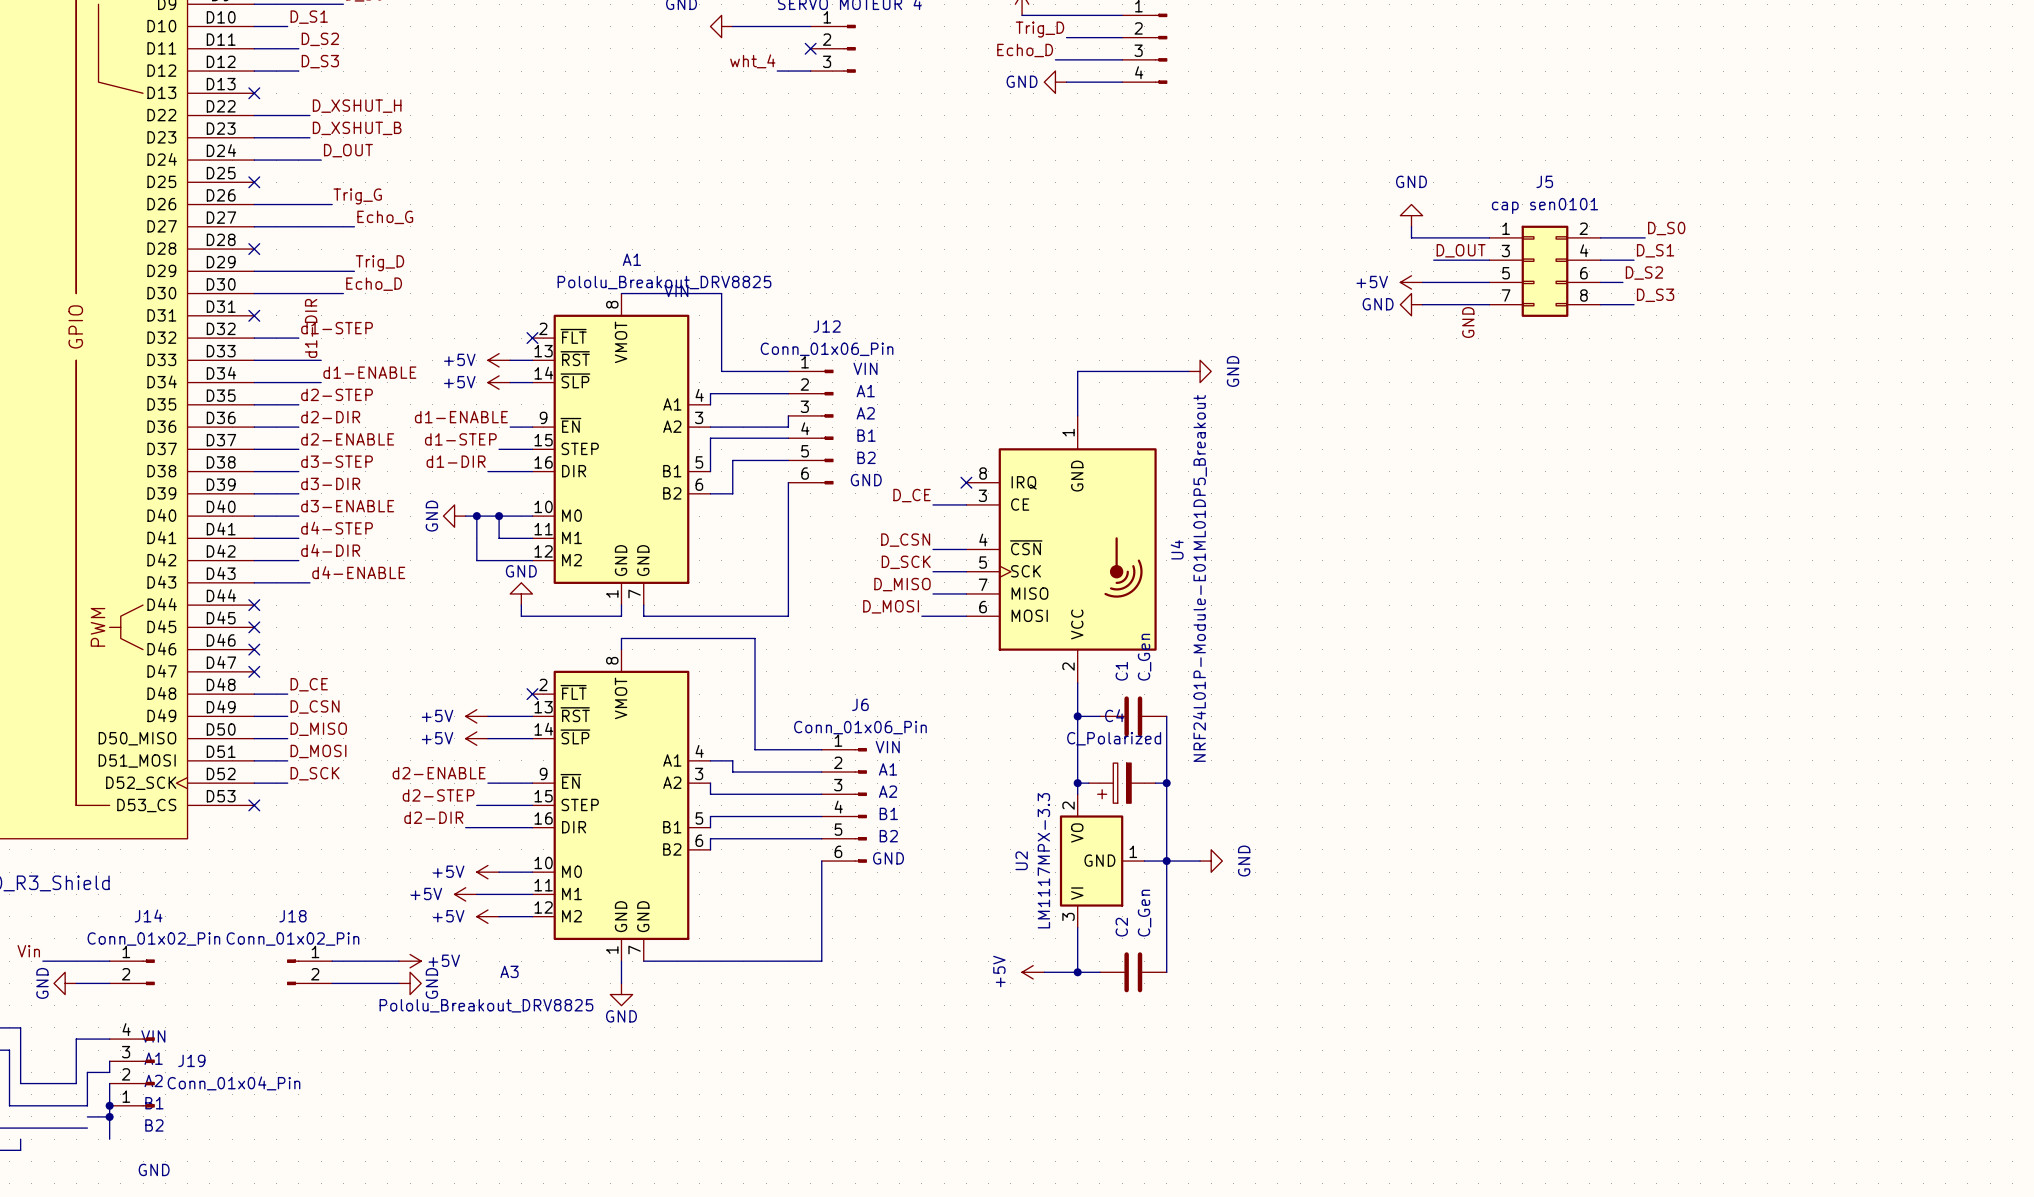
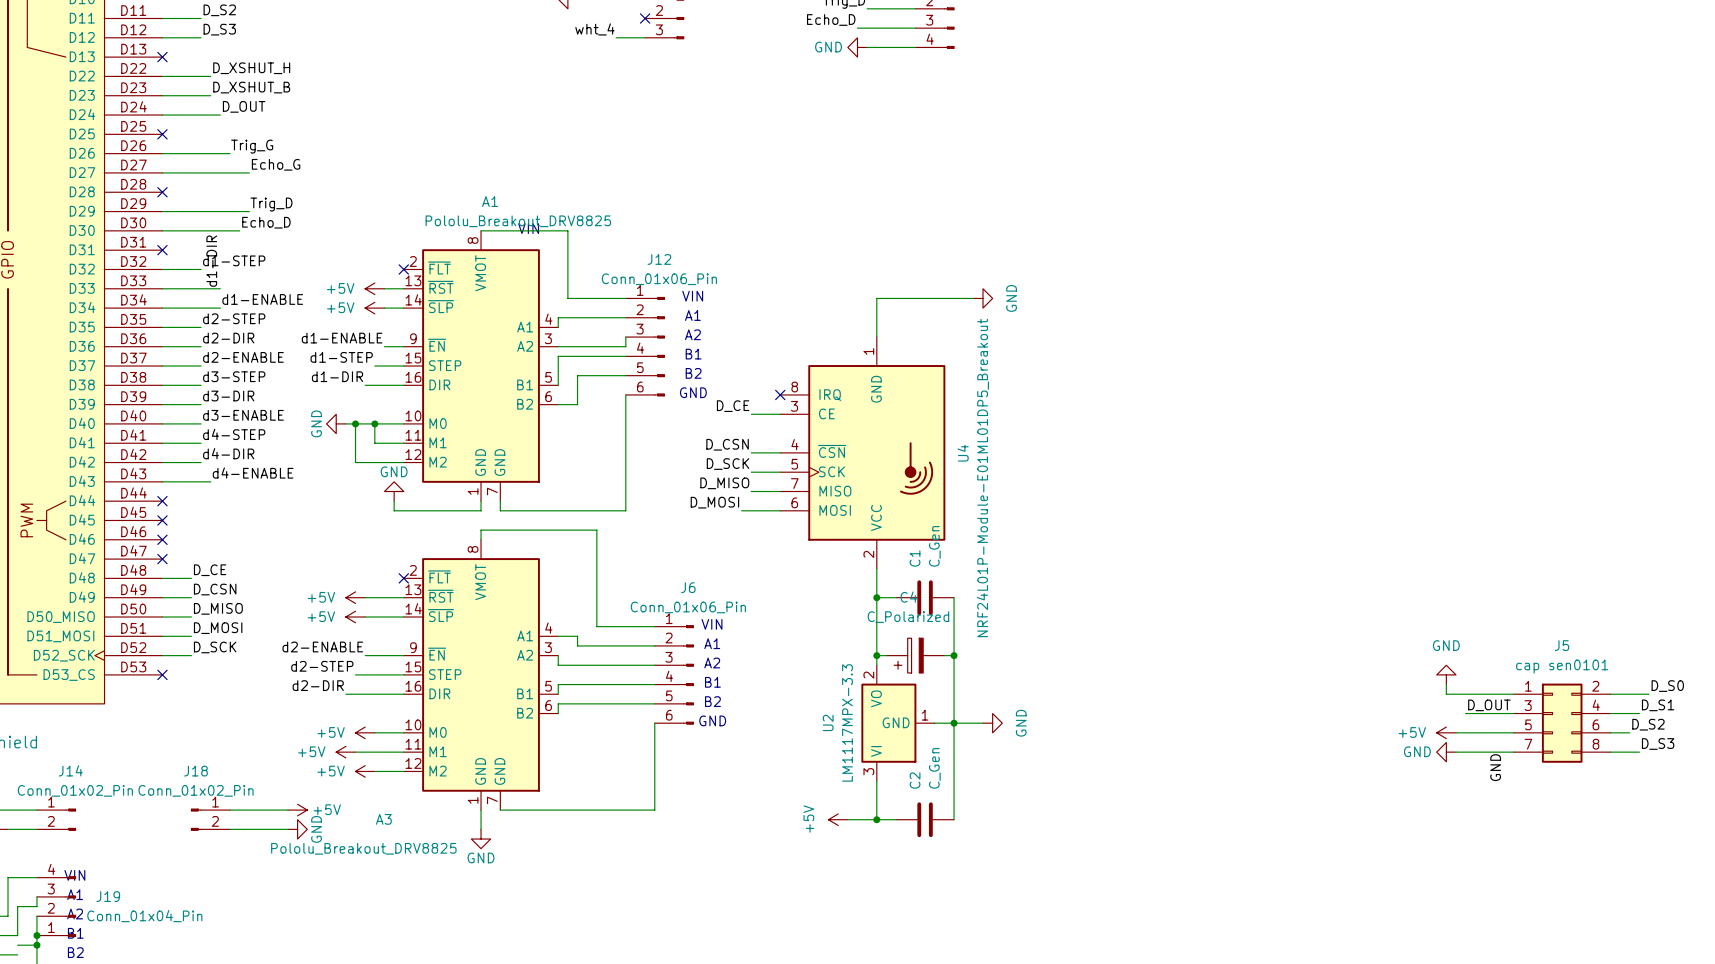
power symbol: GND (1411, 215) -> none
wire: (1411, 226) (1411, 237) (1489, 237) -> none
label: D_S0 (1666, 228) -> none
wire: (1600, 237) (1645, 237) -> none
label: D_OUT (1461, 250) -> none
label: D_S1 (1655, 250) -> none
wire: (1433, 260) (1489, 260) -> none
wire: (1600, 260) (1634, 260) -> none
J5 position: (1545, 271) -> (1562, 723)
label: D_S2 (1644, 273) -> none
power symbol: +5V (1411, 282) -> none
wire: (1422, 282) (1489, 282) -> none
wire: (1600, 282) (1622, 282) -> none
label: D_S3 (1655, 295) -> none
power symbol: GND (1411, 304) -> none
wire: (1422, 304) (1489, 304) -> none
wire: (1600, 304) (1634, 304) -> none
label: GND (1468, 322) -> none
power symbol: none -> GND (1446, 674)
wire: none -> (1446, 684) (1446, 694) (1513, 694)
label: none -> D_S0 (1667, 686)
wire: none -> (1610, 694) (1649, 694)
label: none -> D_OUT (1489, 705)
label: none -> D_S1 (1658, 705)
wire: none -> (1465, 713) (1513, 713)
wire: none -> (1610, 713) (1639, 713)
label: none -> D_S2 (1648, 724)
power symbol: none -> +5V (1446, 732)
wire: none -> (1456, 732) (1513, 732)
wire: none -> (1610, 732) (1629, 732)
label: none -> D_S3 (1658, 743)
power symbol: none -> GND (1446, 752)
wire: none -> (1456, 752) (1513, 752)
wire: none -> (1610, 752) (1639, 752)
label: none -> GND (1495, 767)

